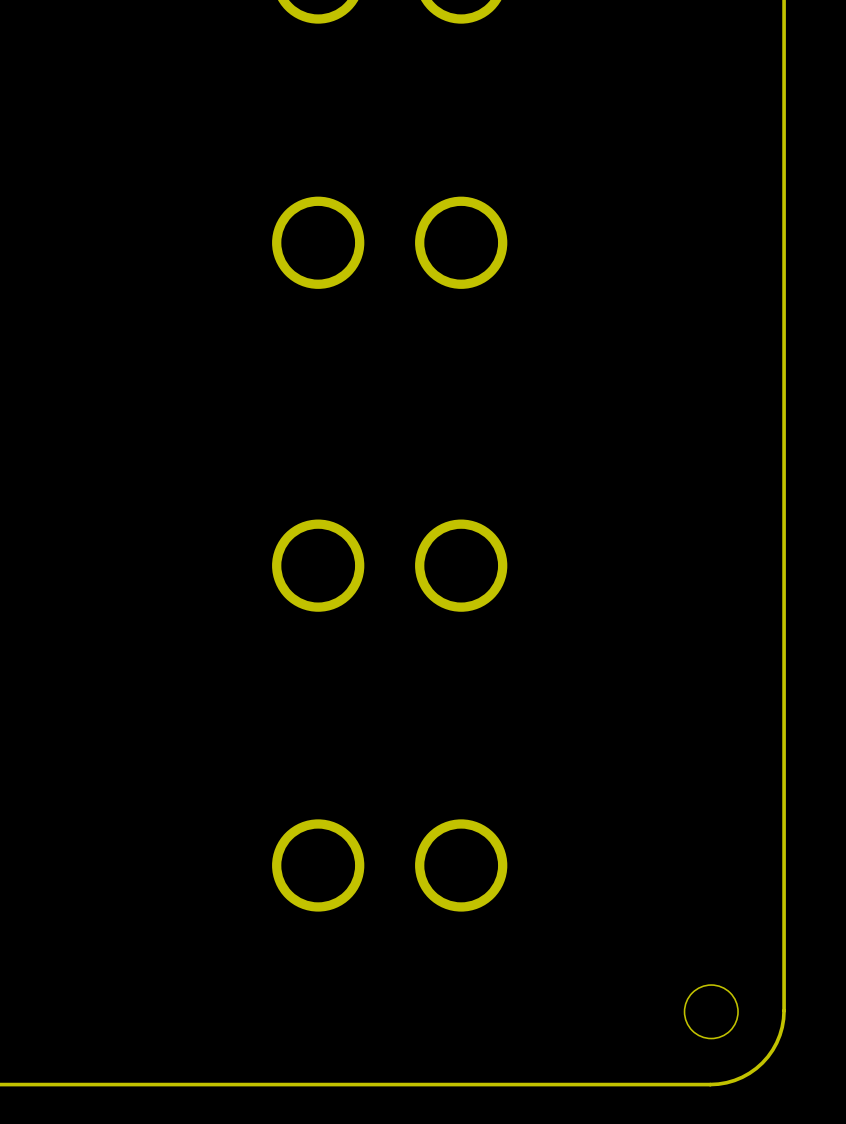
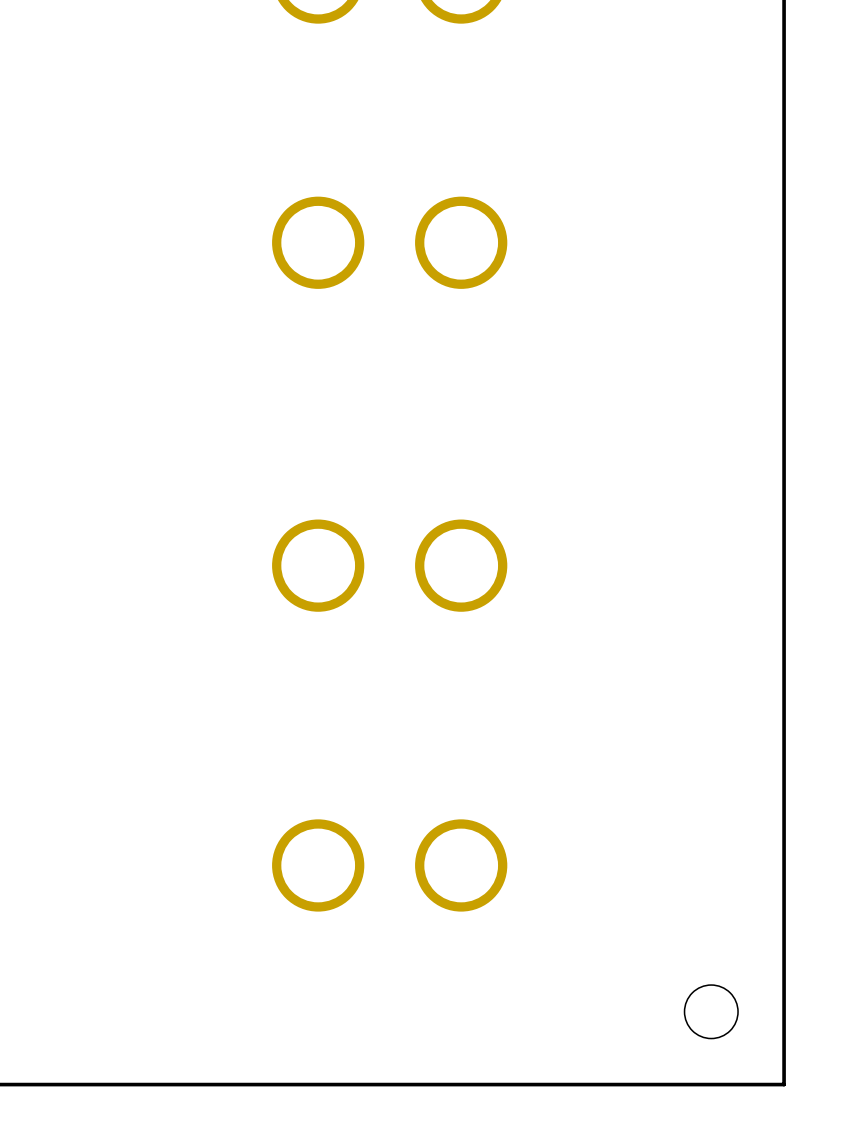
board edge: (784, 1010) (779, 1035) (772, 1050) (762, 1062) (742, 1077) (726, 1082) (710, 1084) -> (784, 1010) (784, 1084) (710, 1084)

